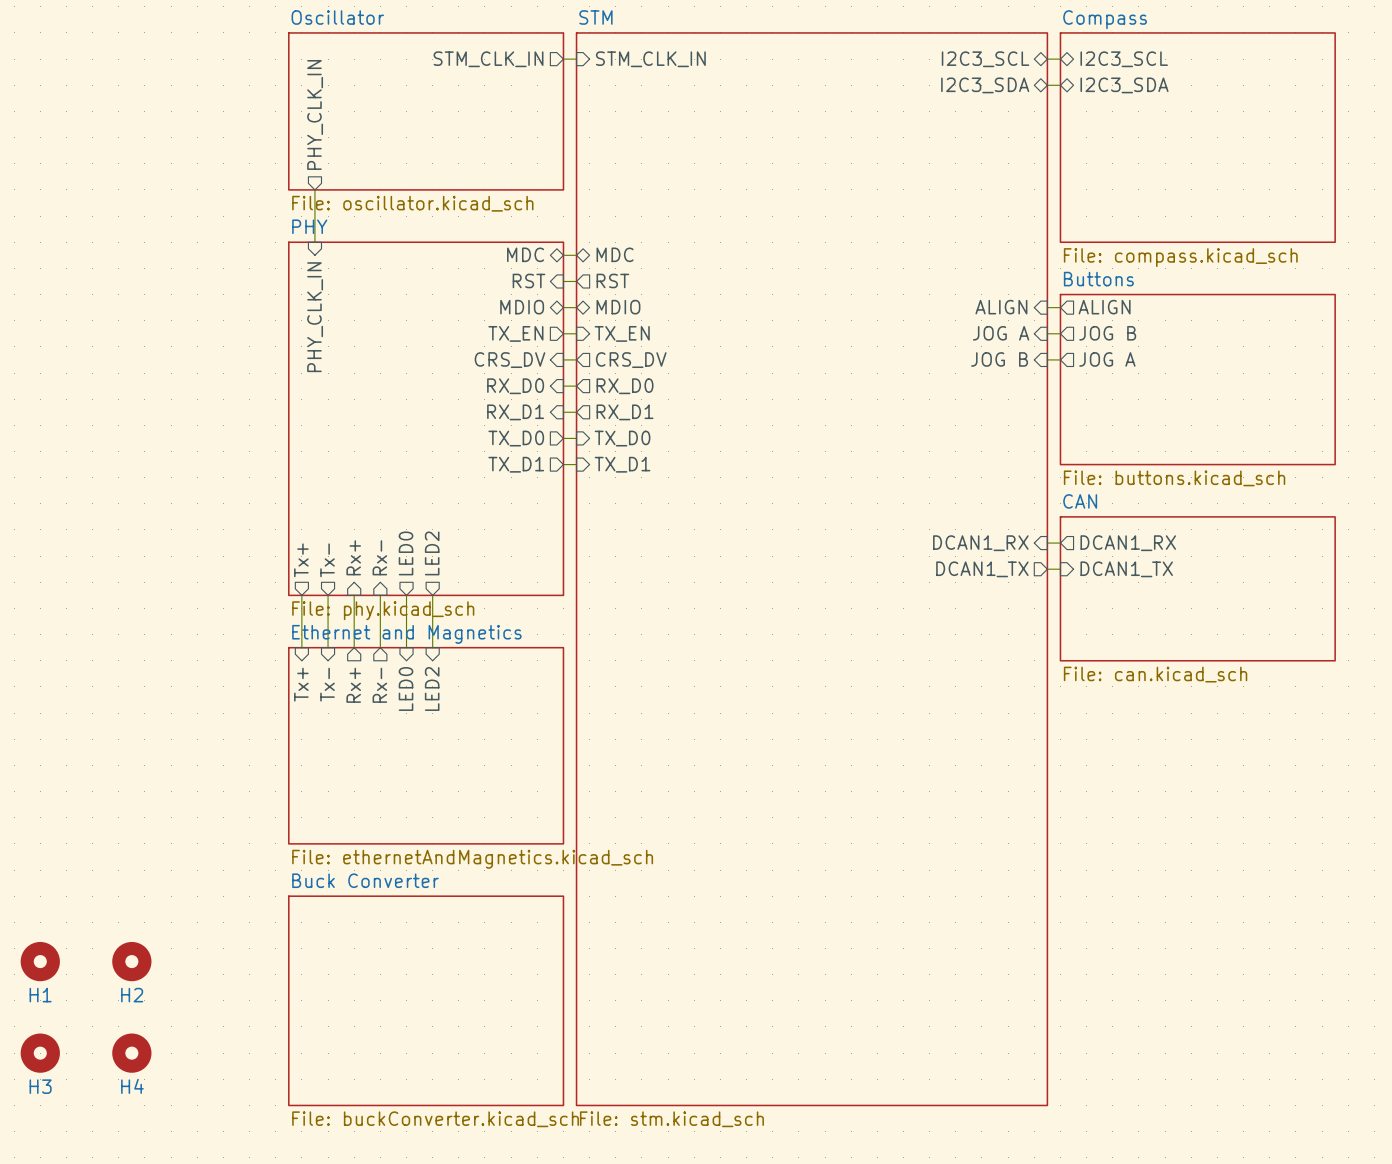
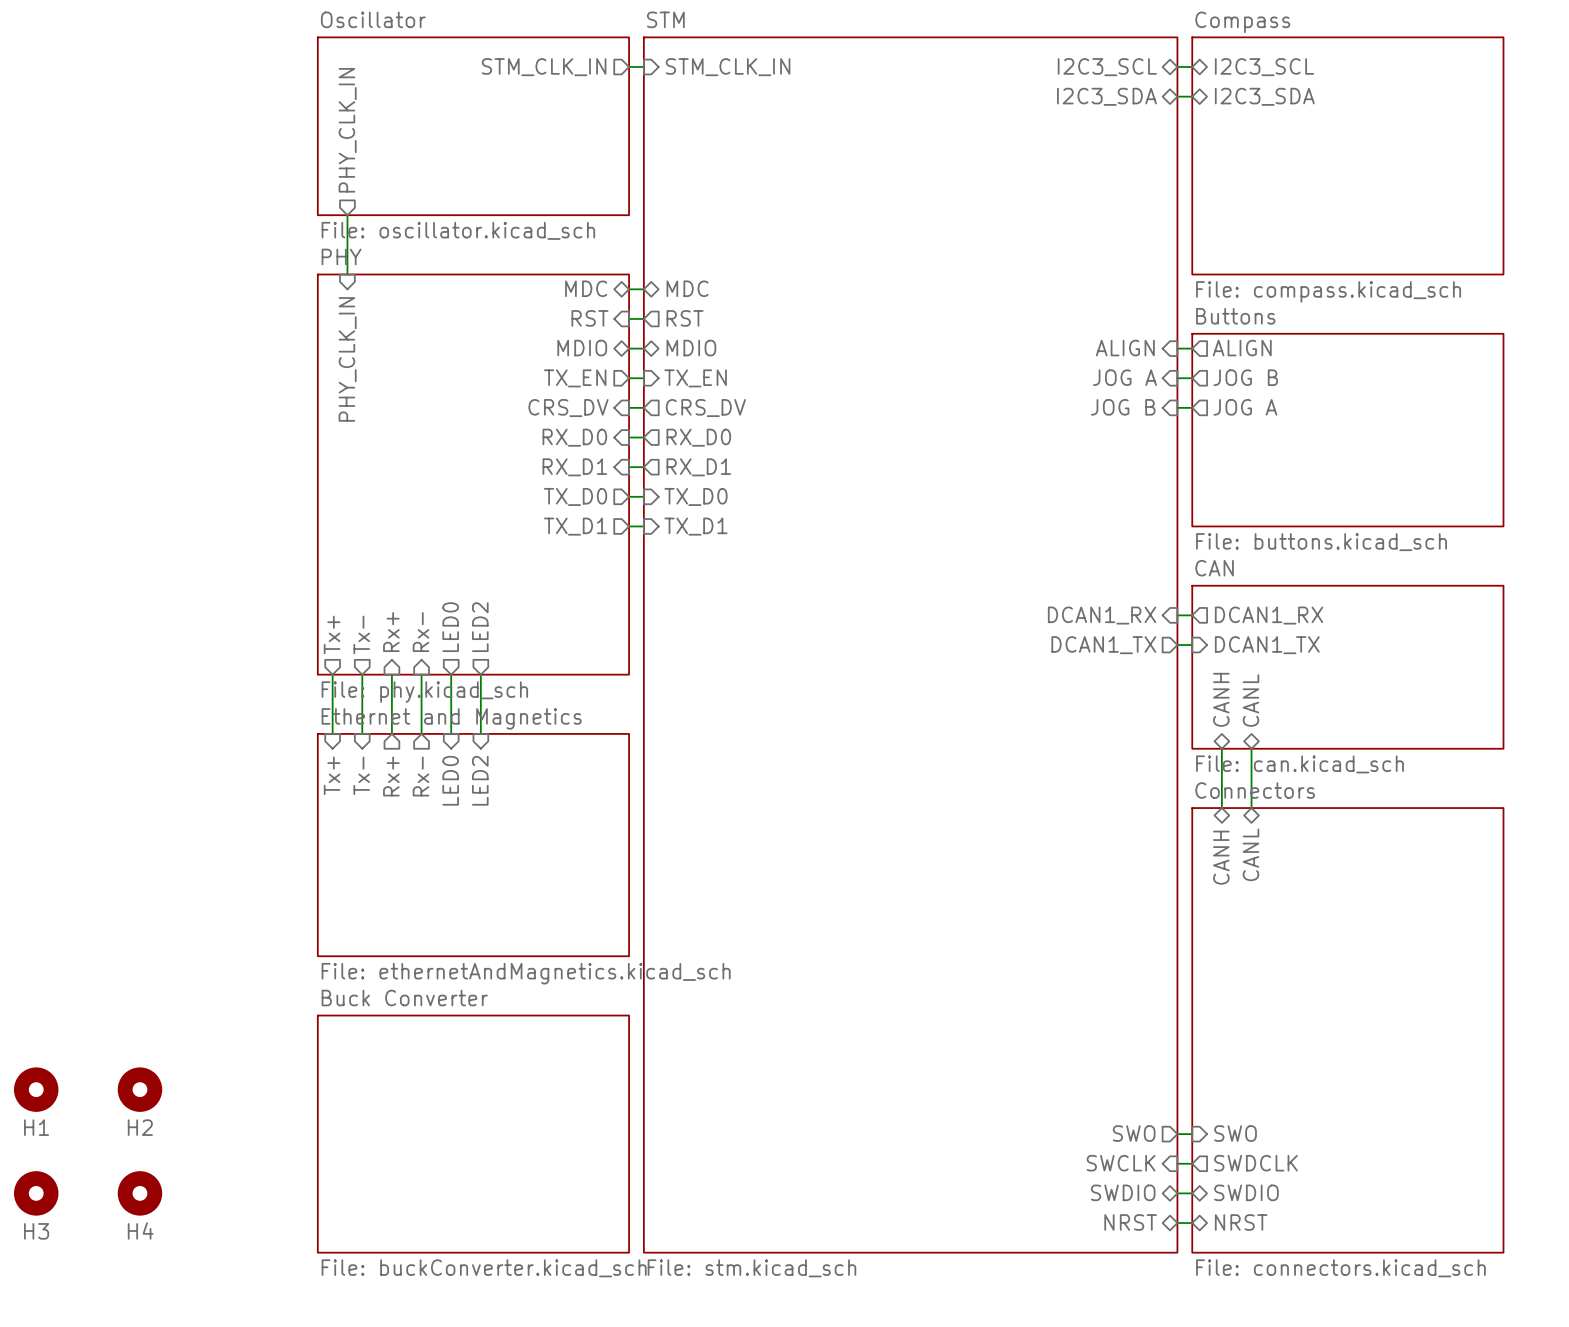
sheet pin: none -> CANH (1221, 699)
sheet pin: none -> CANL (1250, 700)
wire: none -> (1221, 748) (1221, 808)
wire: none -> (1251, 748) (1251, 808)
sheet pin: none -> CANL (1250, 854)
sheet pin: none -> CANH (1221, 857)
sheet Connectors: none -> File: connectors.kicad_sch (1347, 1030)
sheet pin: none -> SWO (1134, 1133)
wire: none -> (1177, 1134) (1192, 1134)
sheet pin: none -> SWO (1235, 1133)
sheet pin: none -> SWCLK (1121, 1163)
wire: none -> (1177, 1163) (1192, 1163)
sheet pin: none -> SWDCLK (1256, 1163)
sheet pin: none -> SWDIO (1123, 1192)
sheet pin: none -> SWDIO (1246, 1192)
wire: none -> (1177, 1193) (1192, 1193)
sheet pin: none -> NRST (1130, 1222)
sheet pin: none -> NRST (1241, 1222)
wire: none -> (1177, 1223) (1192, 1223)

